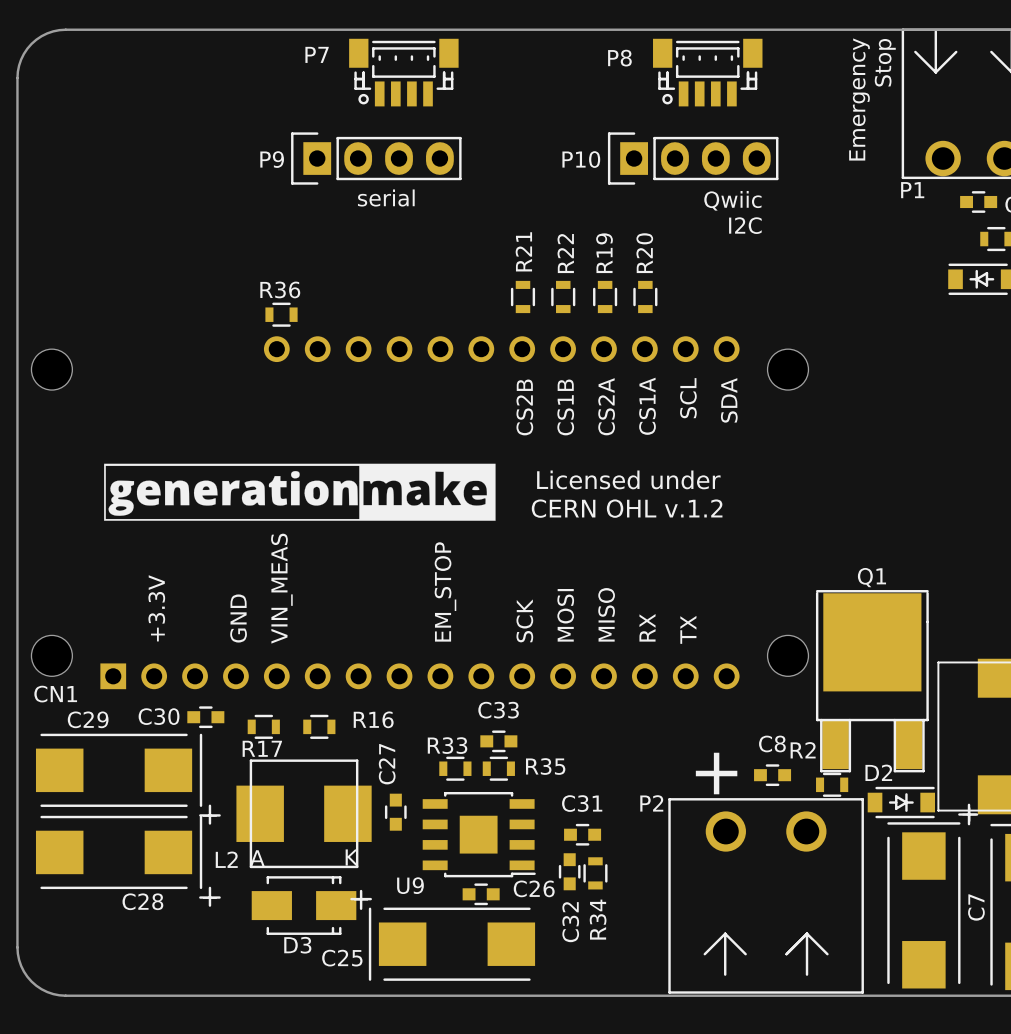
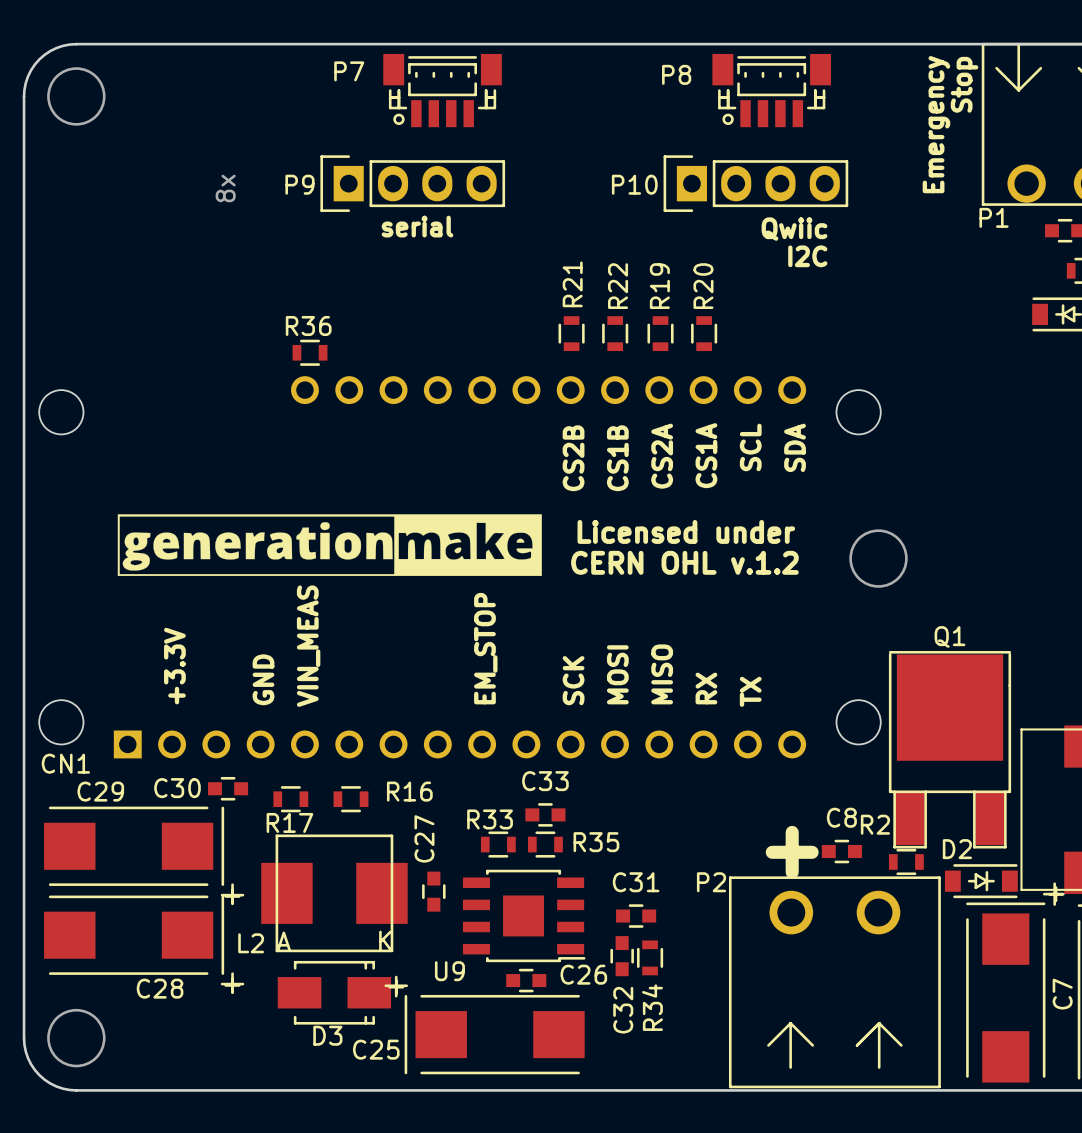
drawing: none -> [47, 67, 106, 126]
text: none -> 8x (225, 188)
drawing: none -> [849, 529, 908, 588]
drawing: none -> [47, 1008, 106, 1068]

